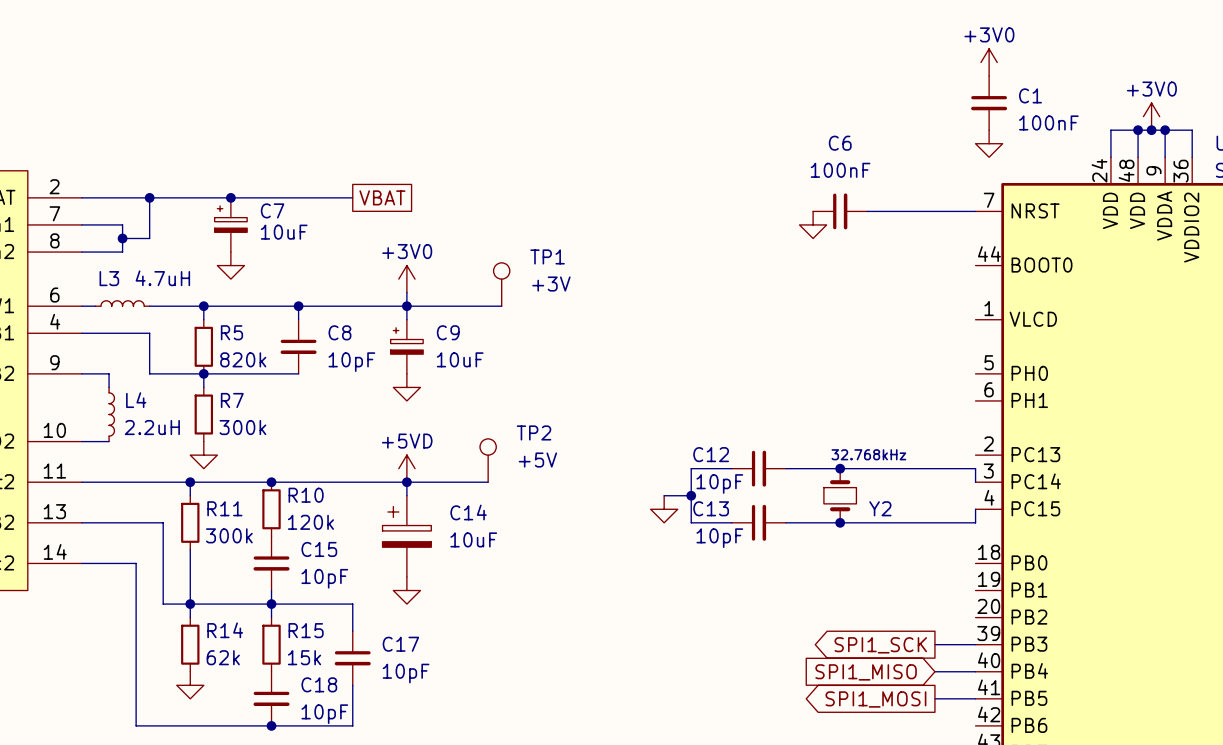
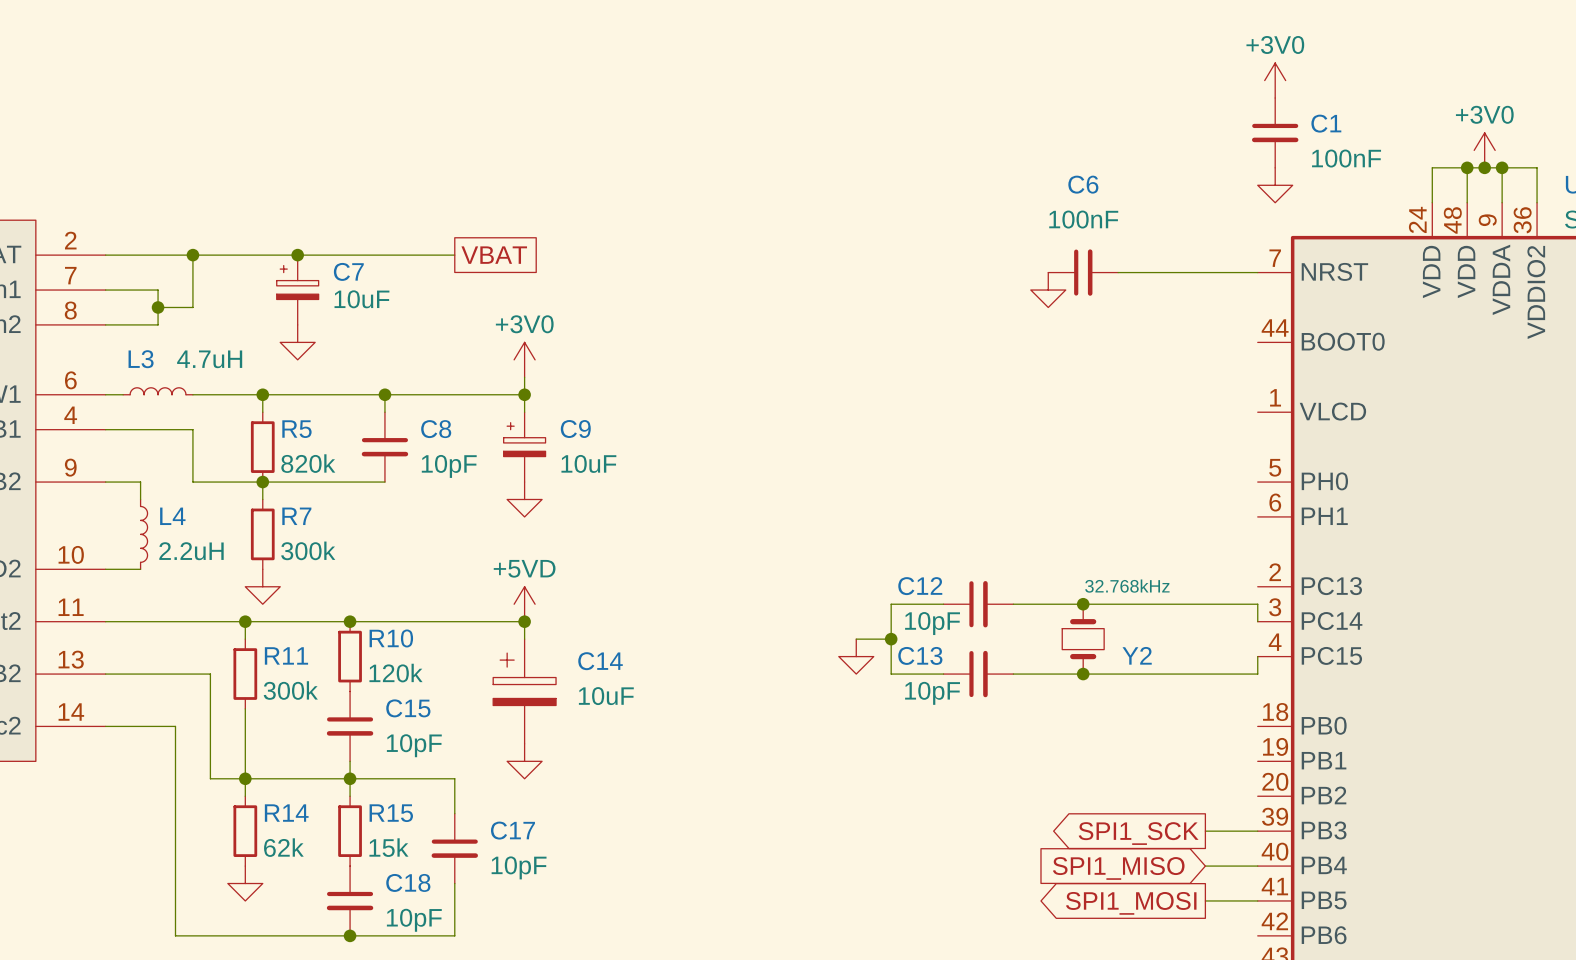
TP1: +3V (501, 284) -> none
wire: (406, 306) (501, 306) -> none
TP2: +5V (488, 460) -> none
wire: (406, 482) (488, 482) -> none

